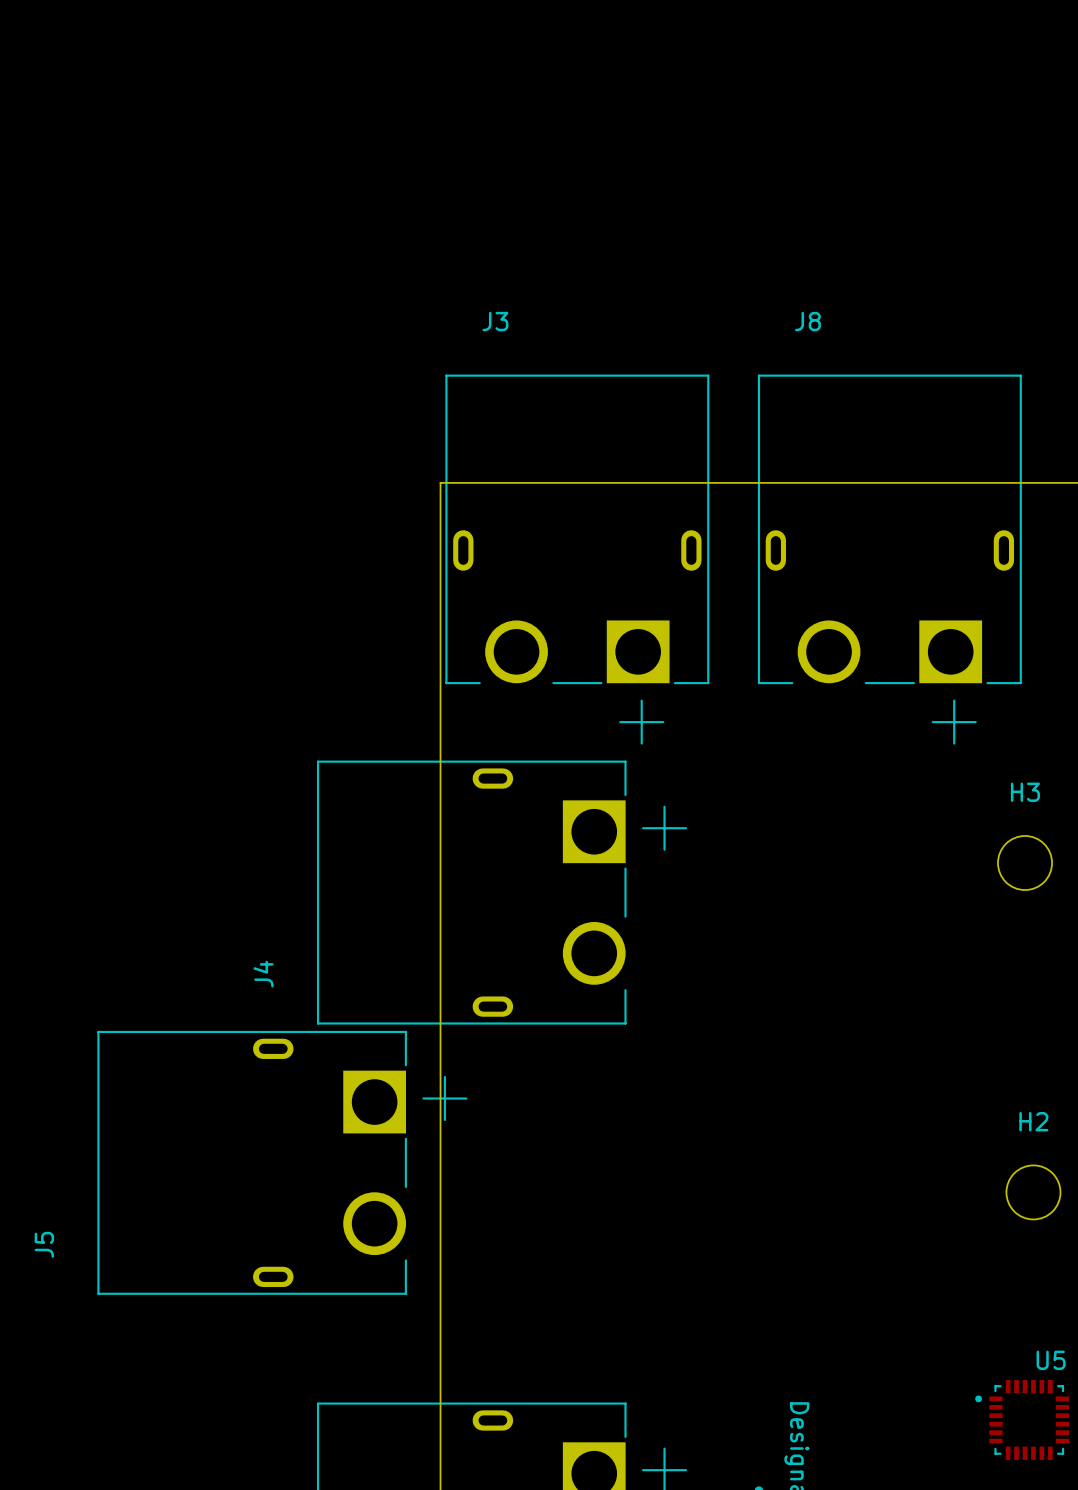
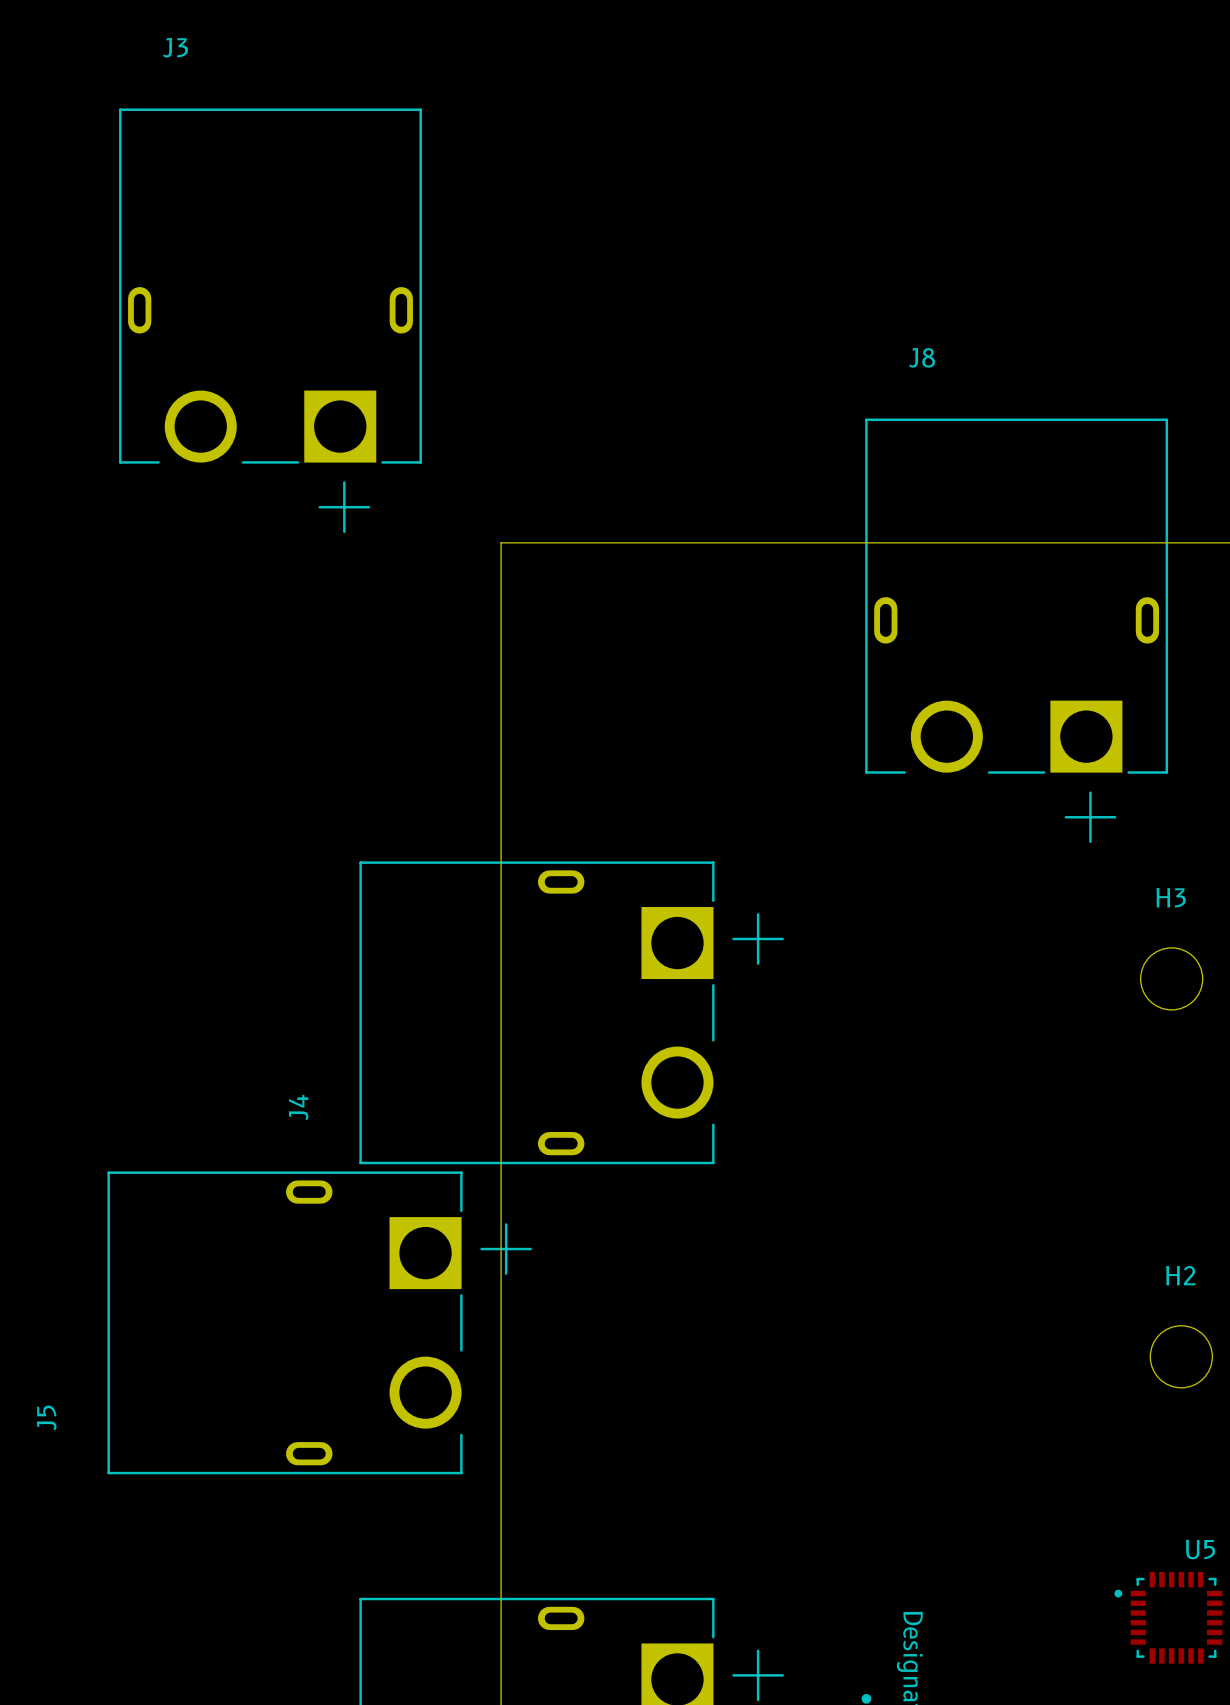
J3 position: (577, 559) -> (270, 320)

